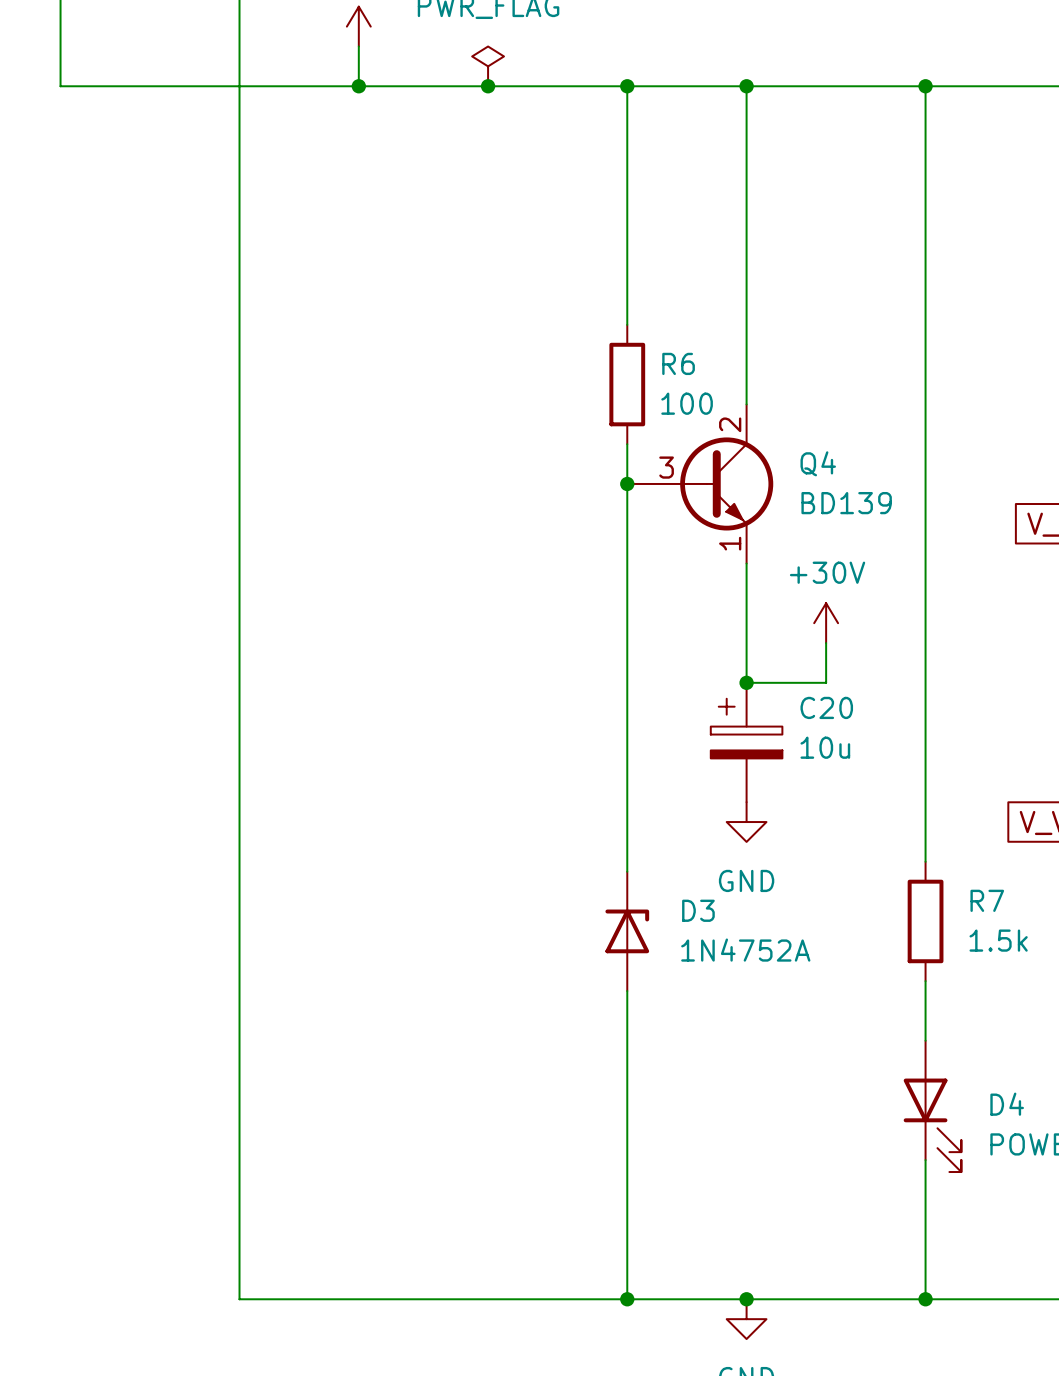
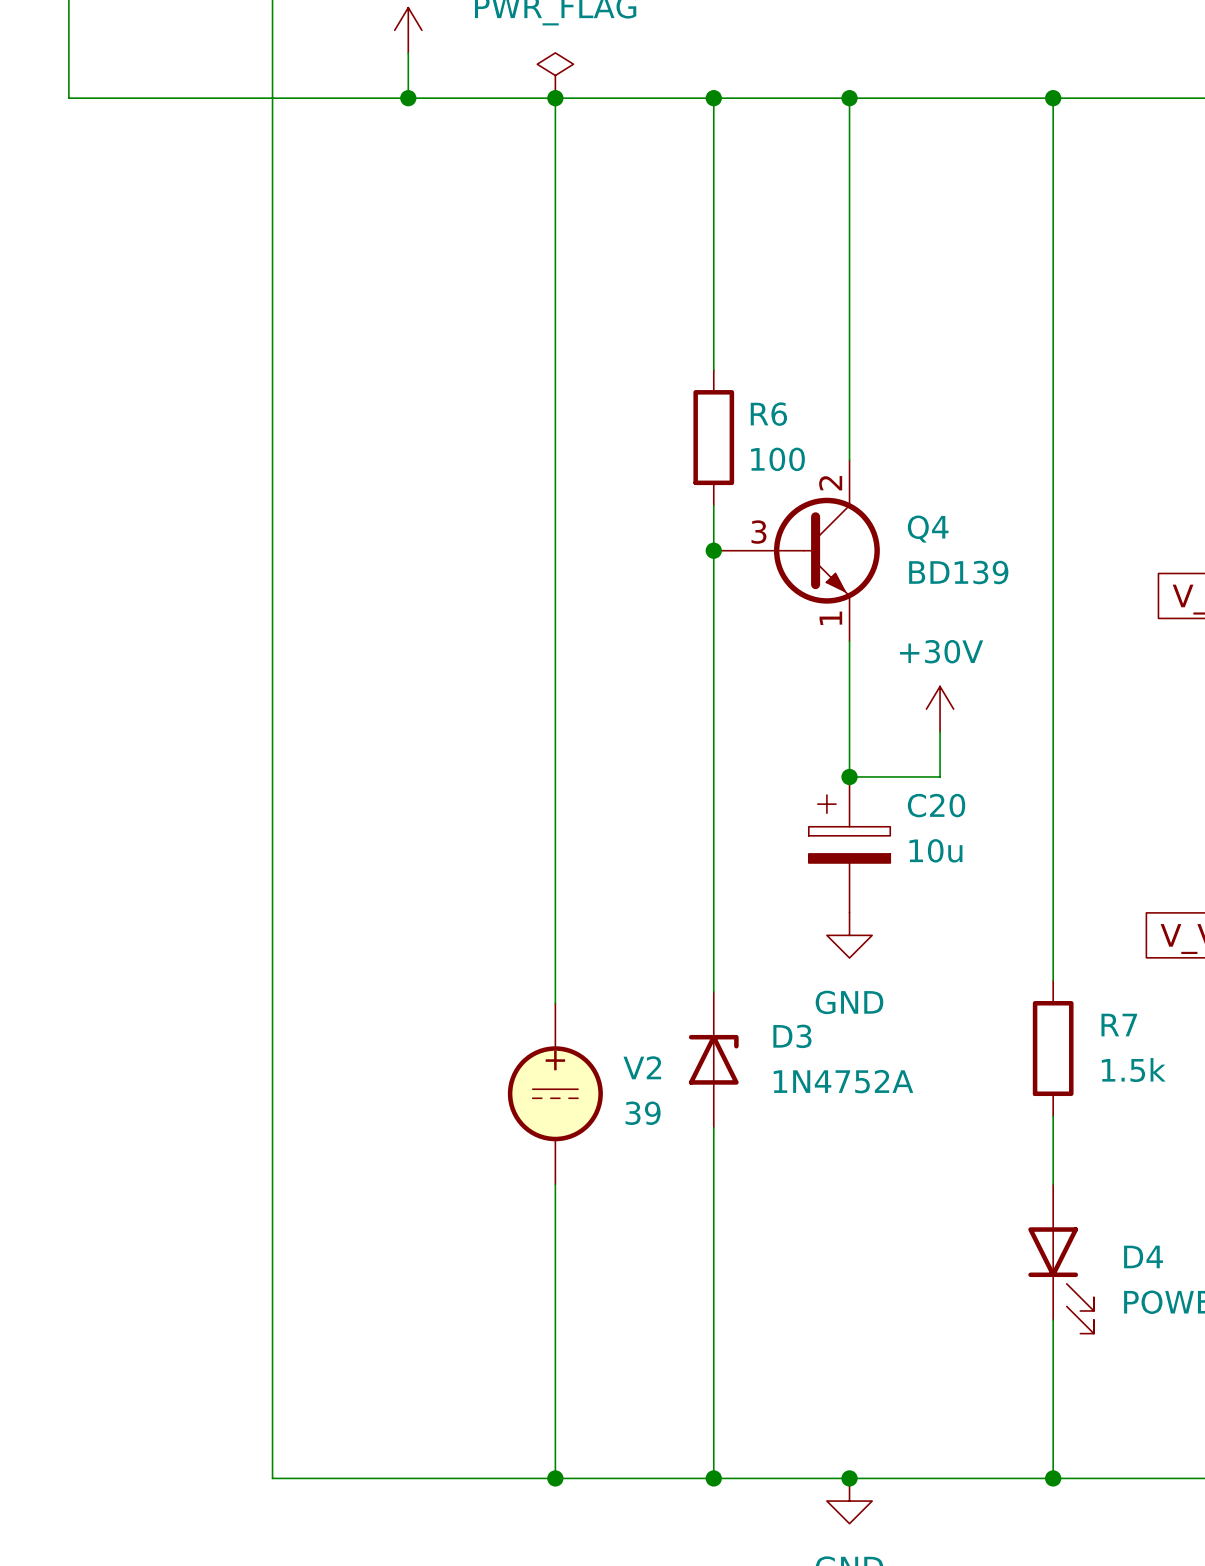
wire: none -> (555, 98) (555, 1003)
V2: none -> 39 (555, 1093)
wire: none -> (555, 1184) (555, 1478)
junction: none -> (555, 1478)

